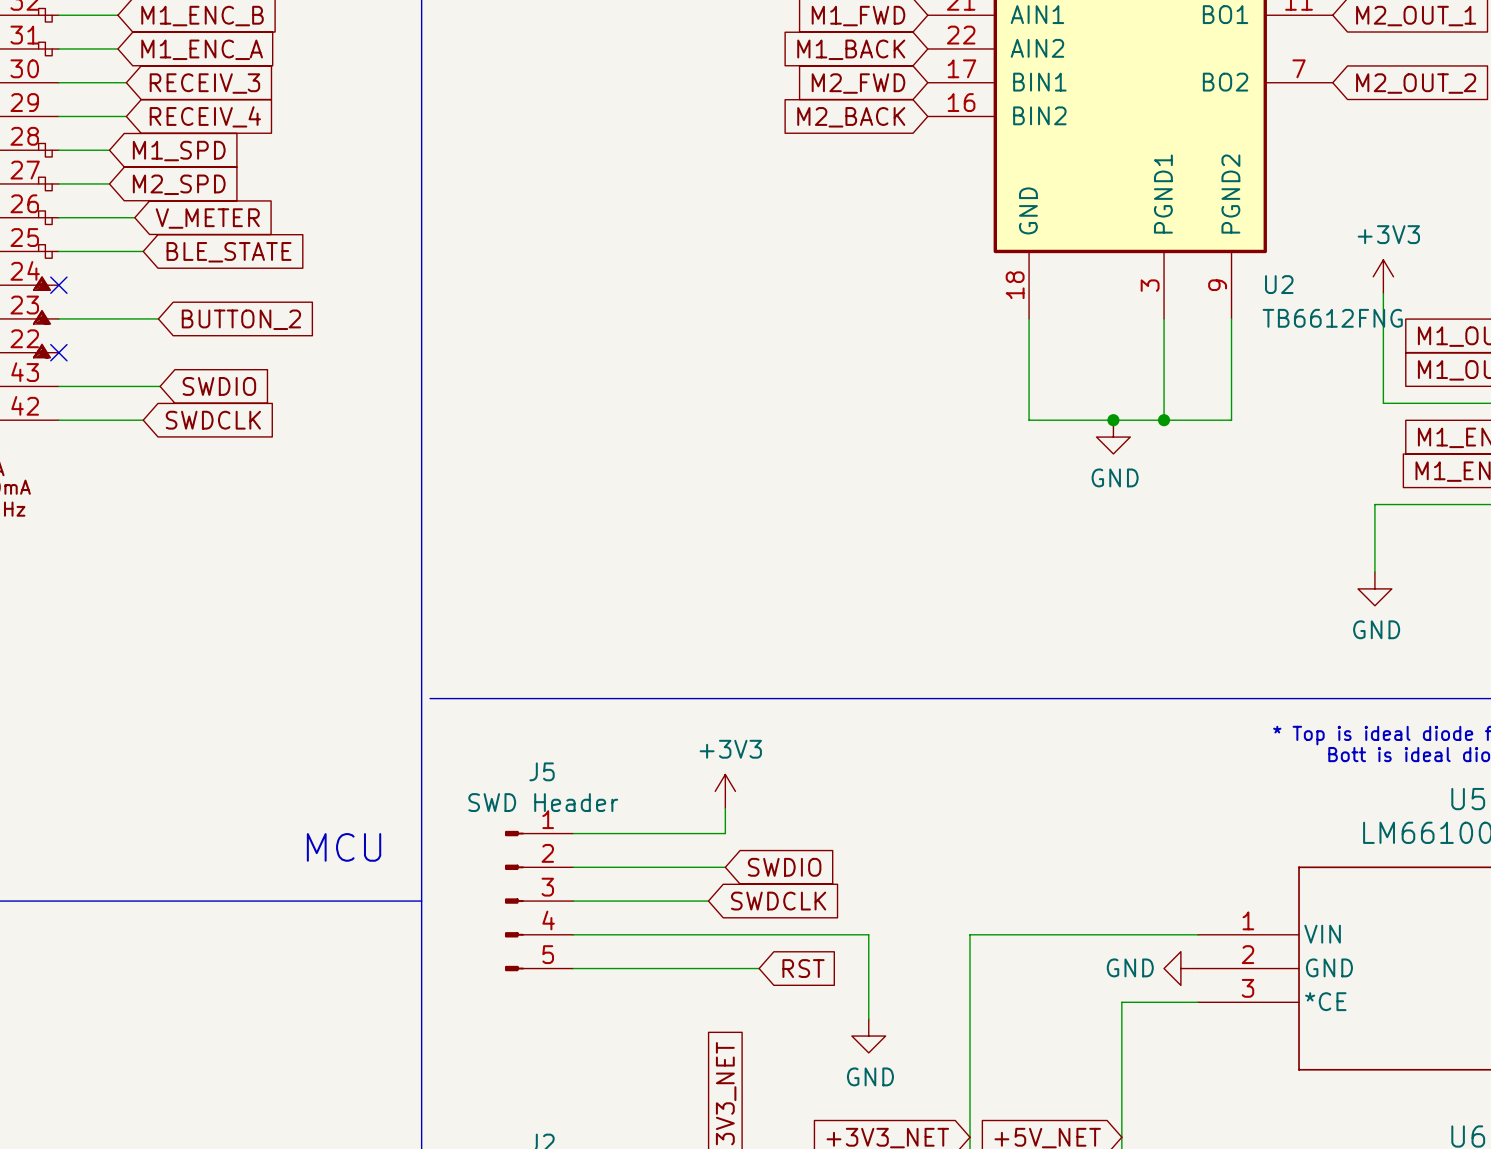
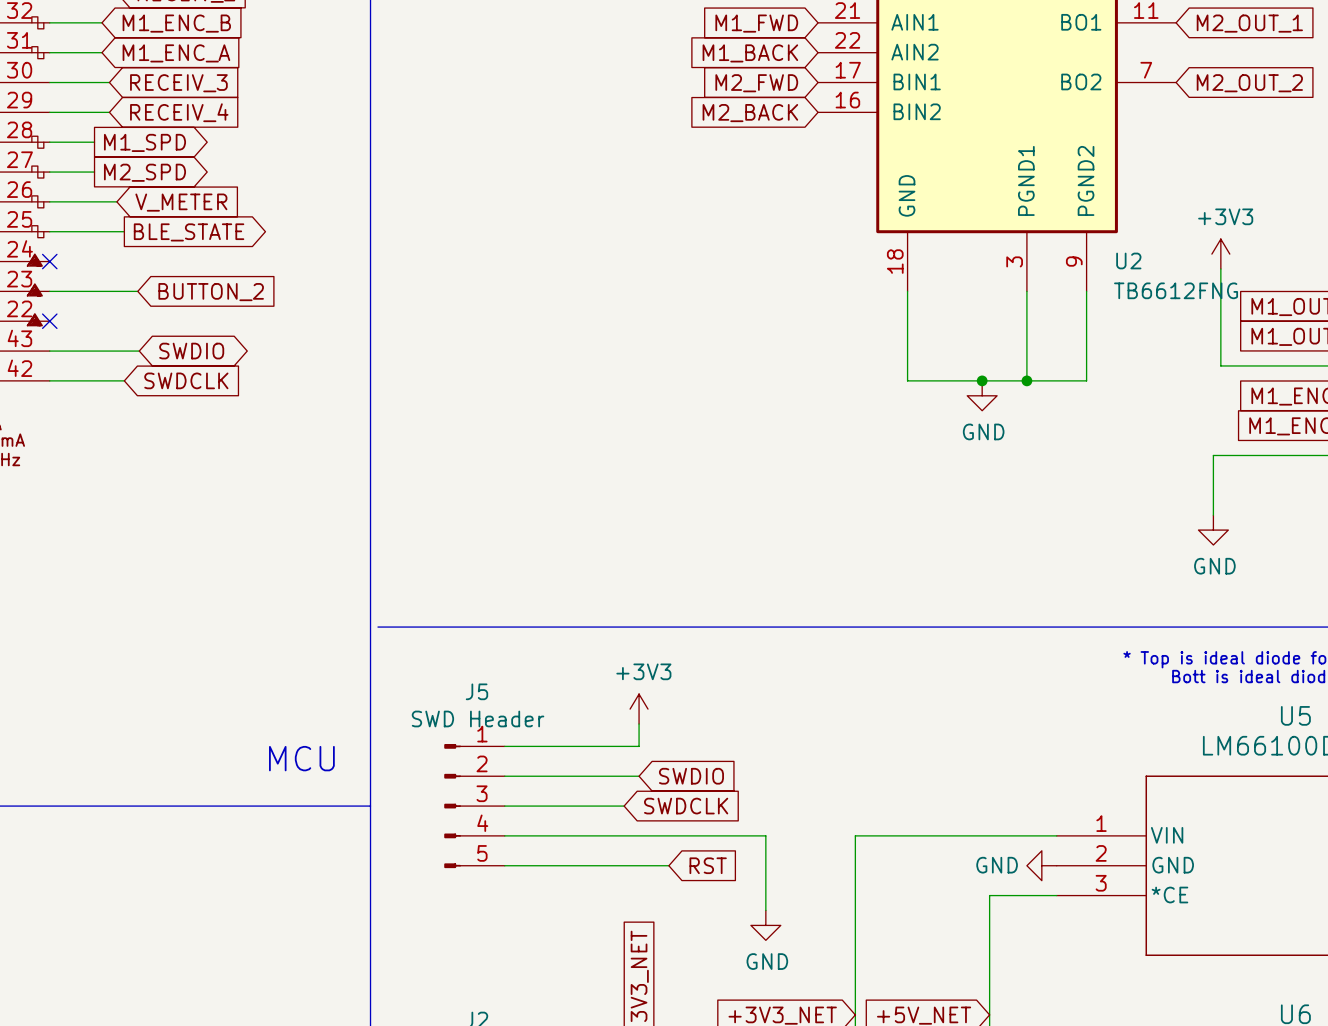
global label shape: input (179, 151) -> output (144, 142)
global label shape: input (179, 184) -> output (144, 172)
global label shape: input (229, 252) -> output (189, 232)
global label shape: input (219, 386) -> bidirectional (191, 351)

